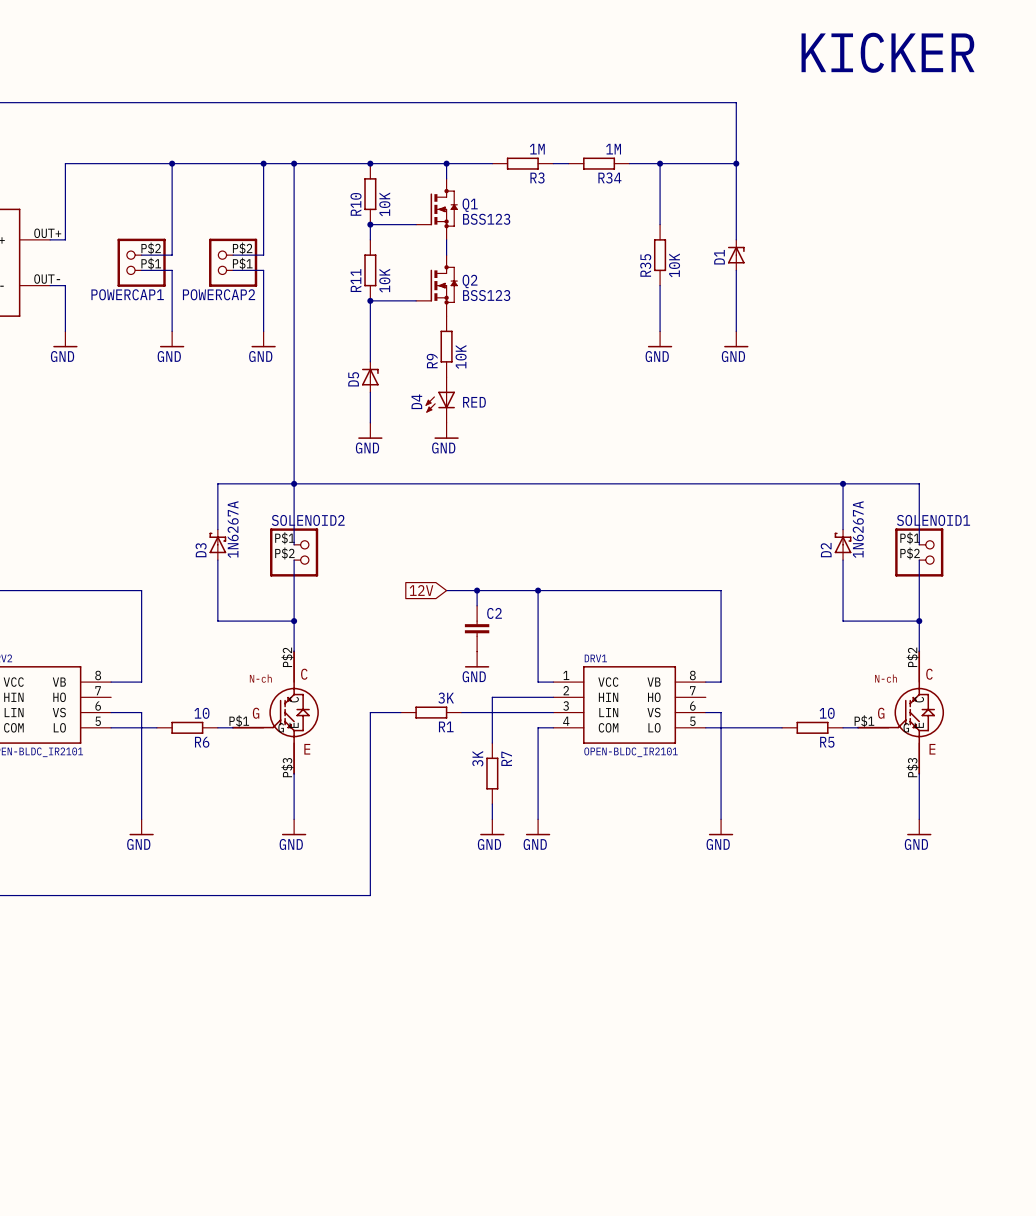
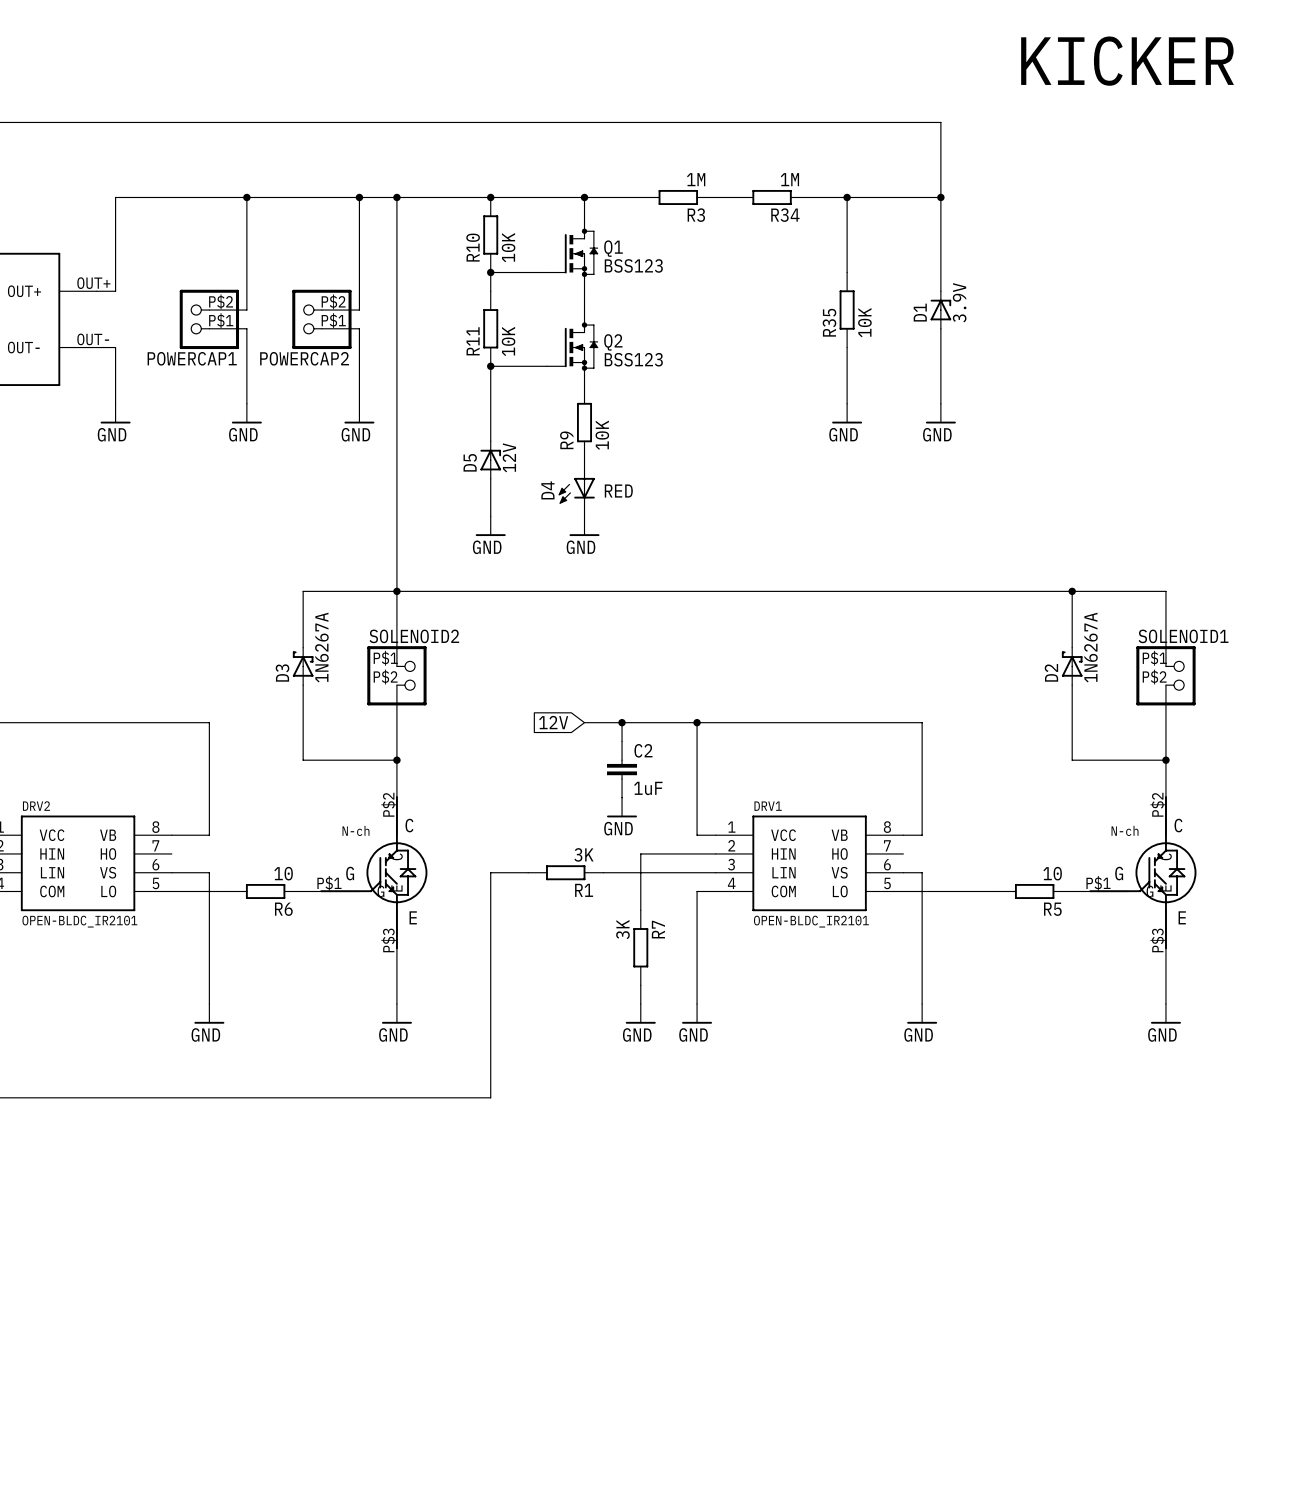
D1 value: none -> 3.9V (959, 302)
D5 value: none -> 12V (509, 457)
C2 value: none -> 1uF (648, 788)

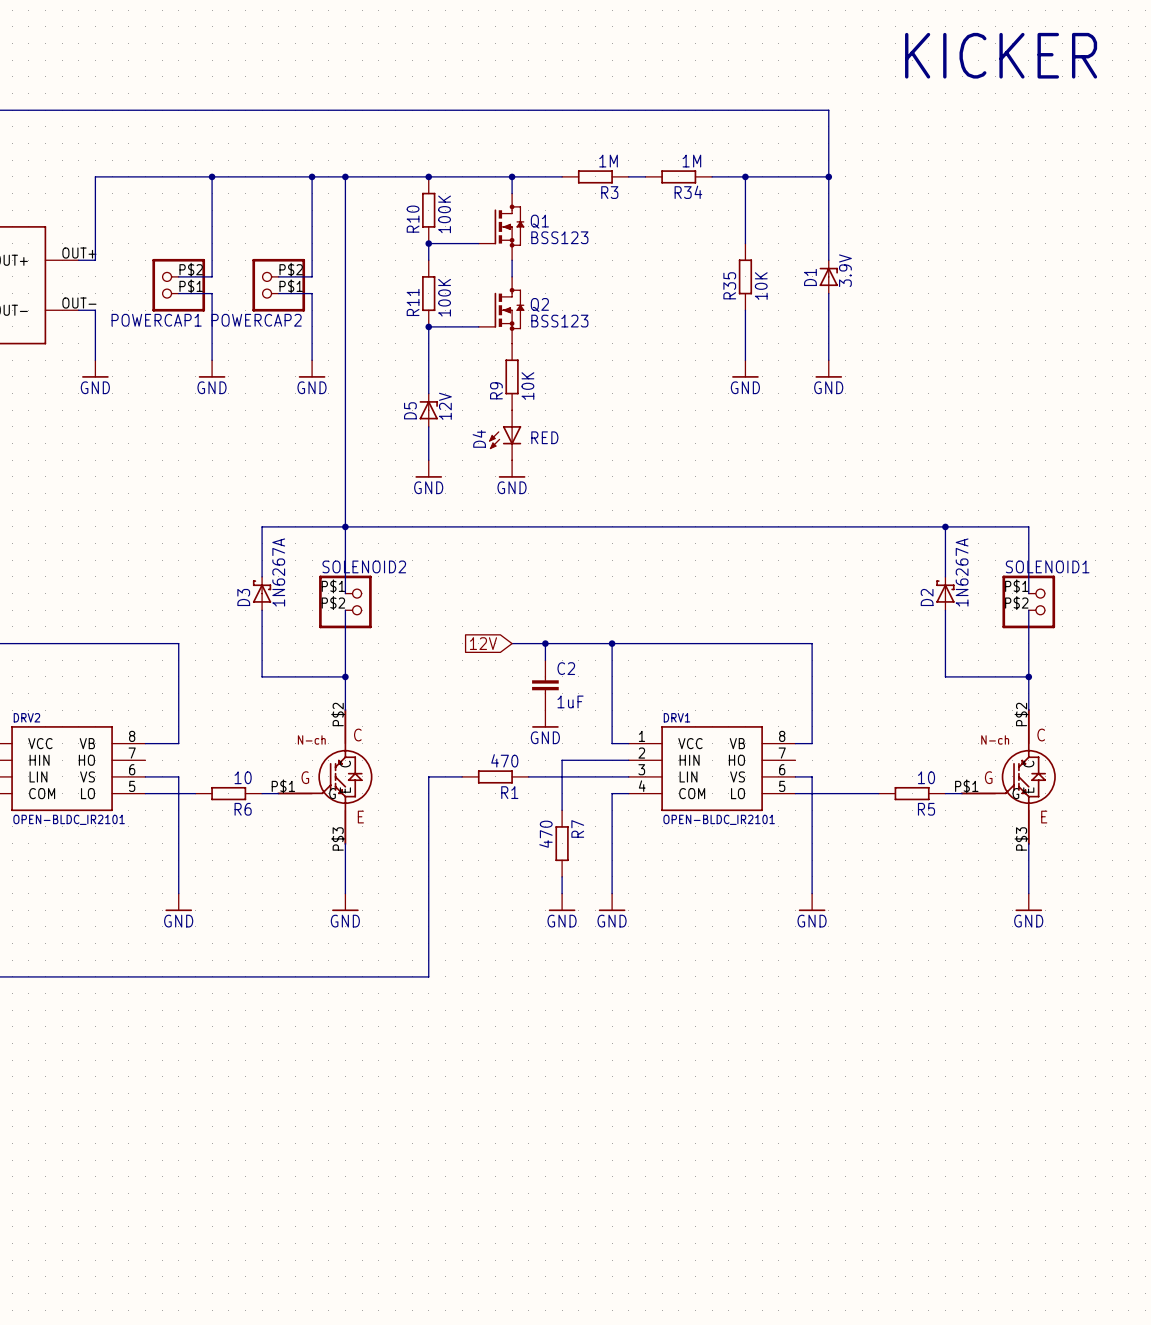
R10 value: 10K (508, 247) -> 100K (444, 214)
R11 value: 10K (508, 341) -> 100K (444, 297)
R1 value: 3K (583, 854) -> 470 (504, 760)
R7 value: 3K (622, 929) -> 470 (545, 834)

